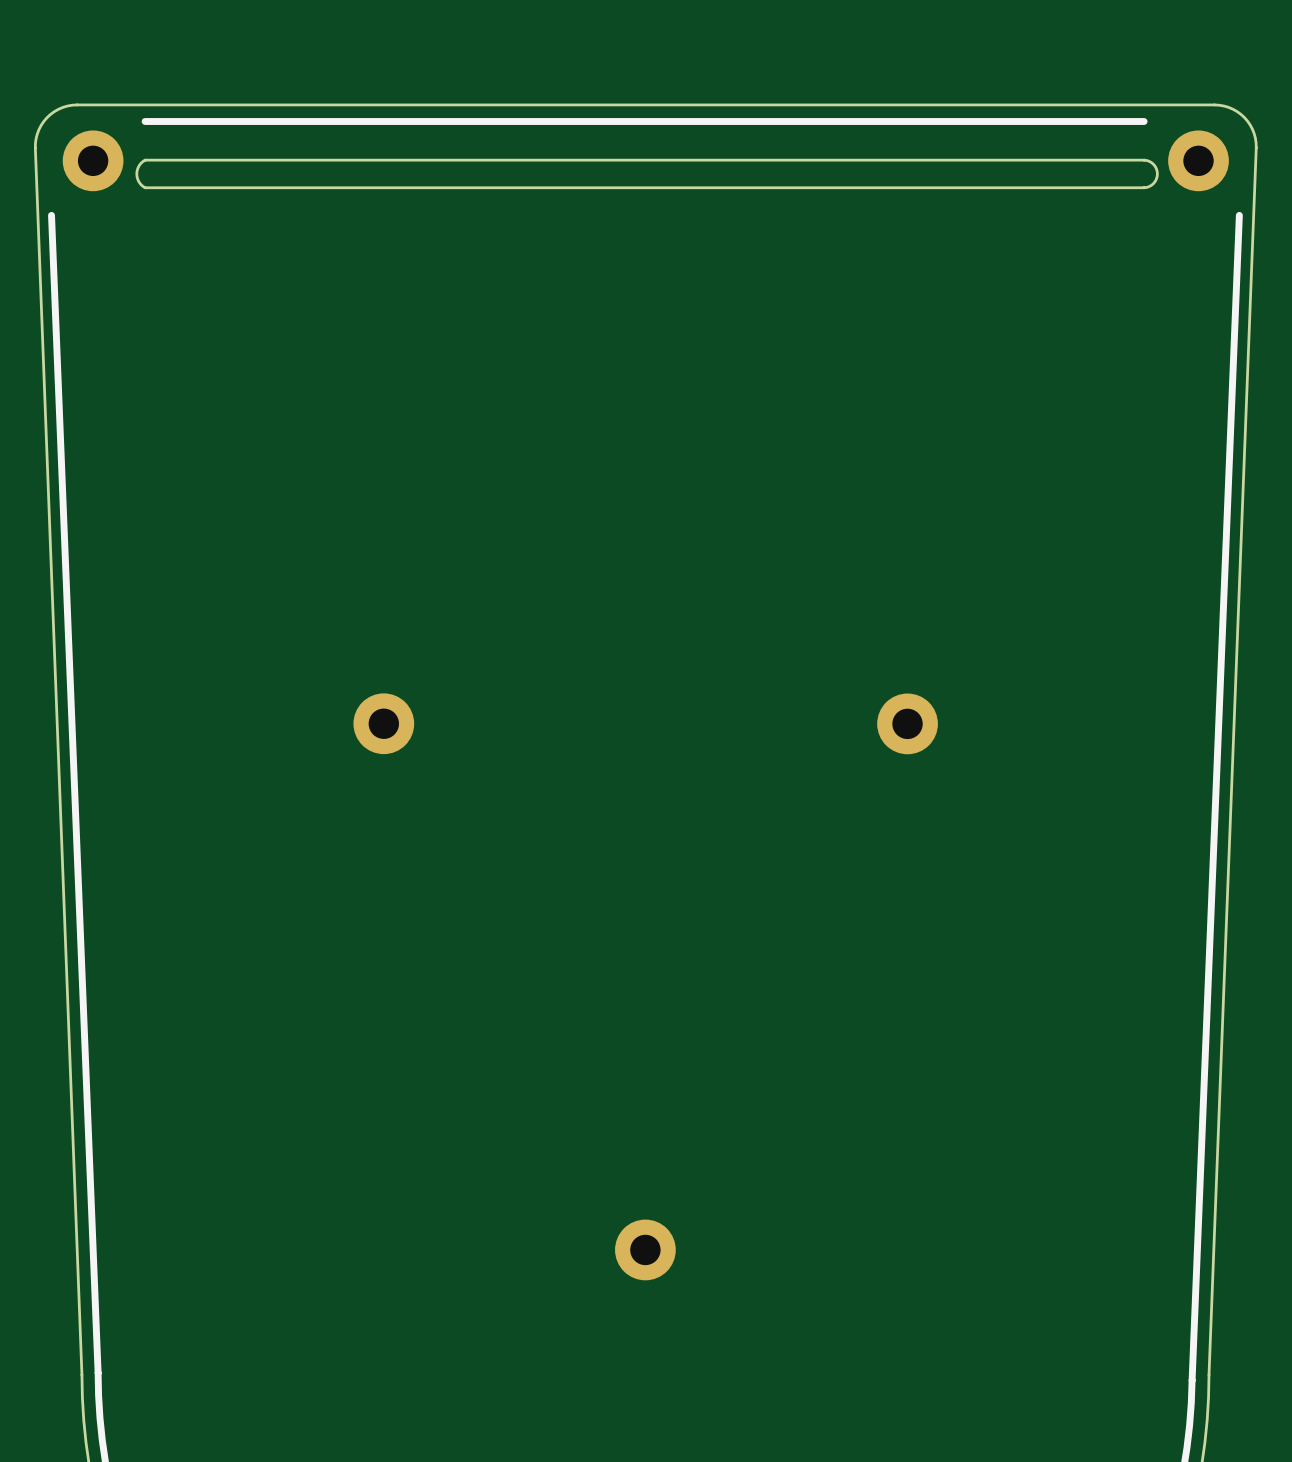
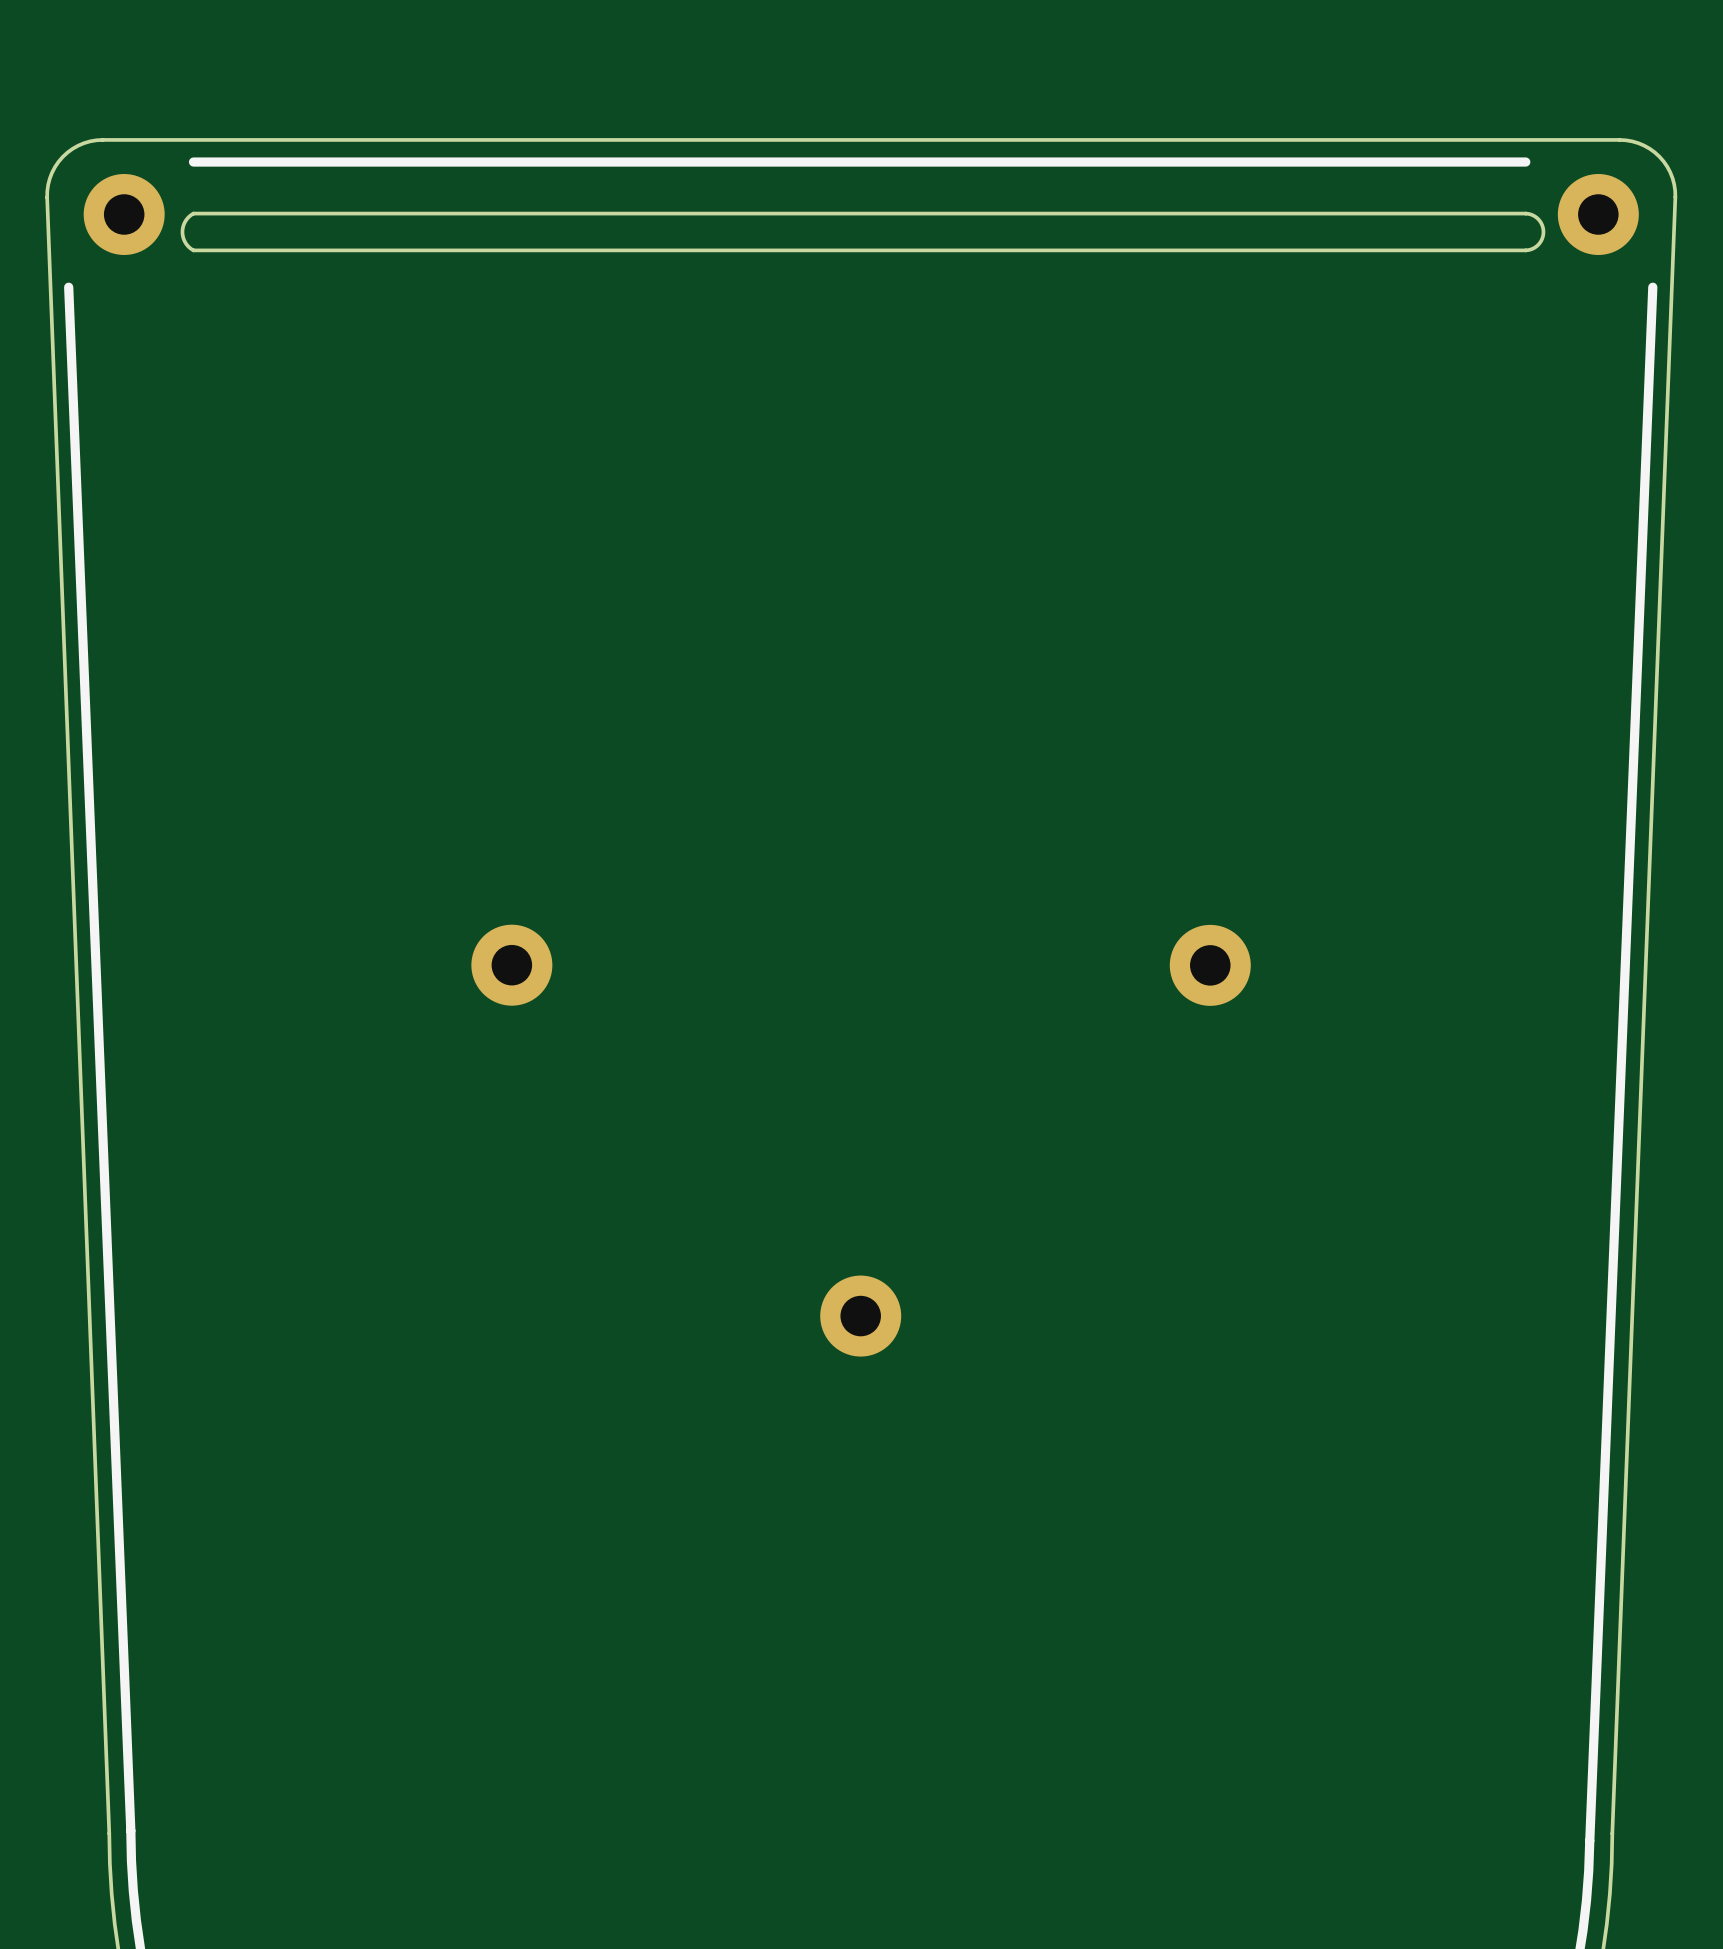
part position: (645, 1249) -> (860, 1316)

